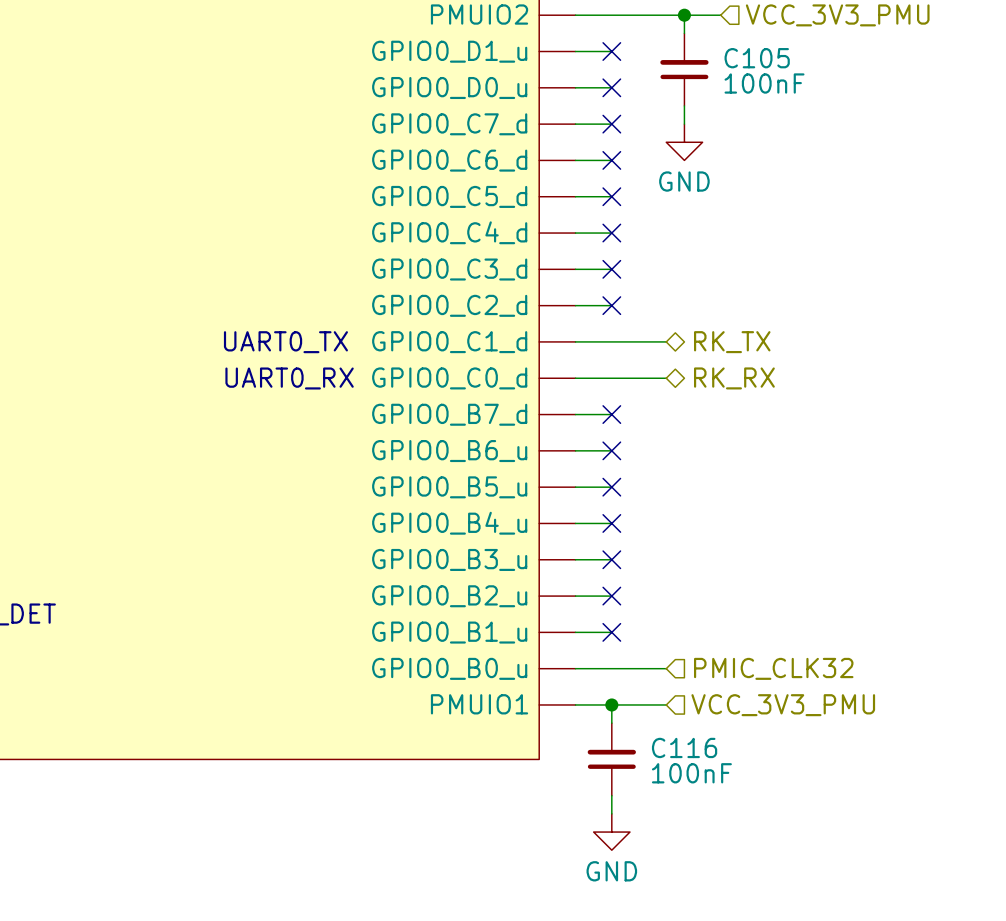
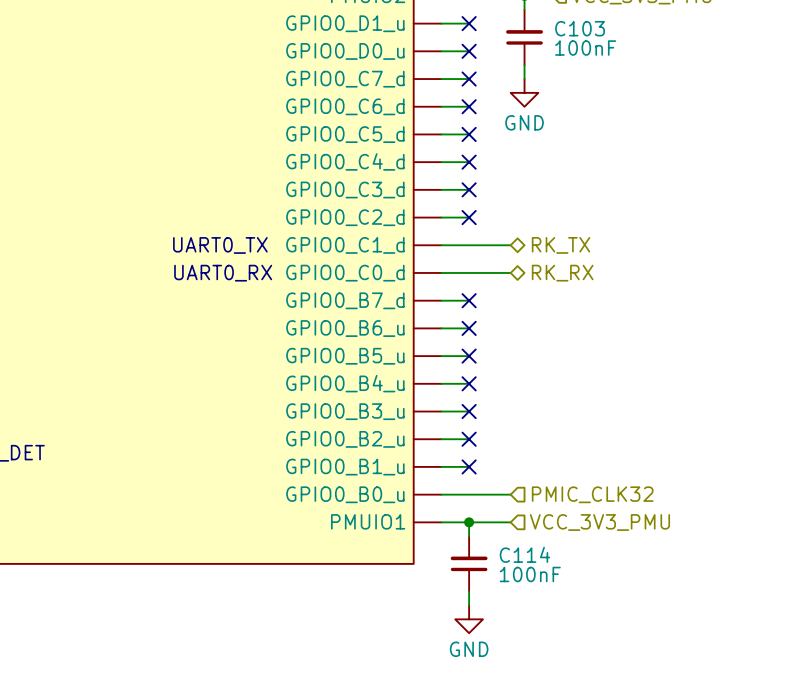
C105 name: C105 (757, 58) -> C103 (580, 28)
C116 name: C116 (684, 747) -> C114 (524, 554)

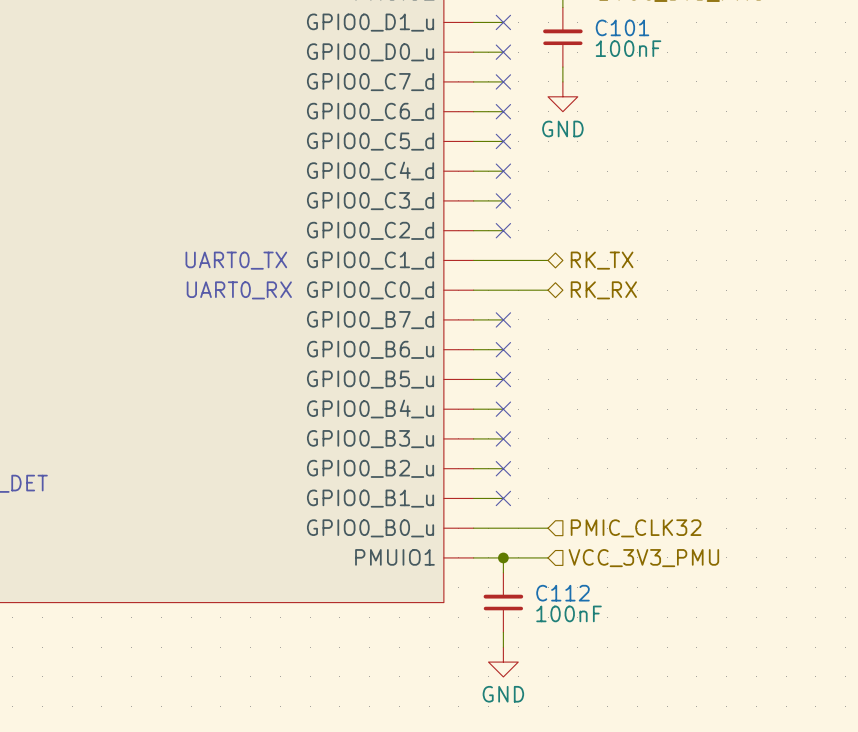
C103 name: C103 (580, 28) -> C101 (622, 27)
C114 name: C114 (524, 554) -> C112 (563, 593)

